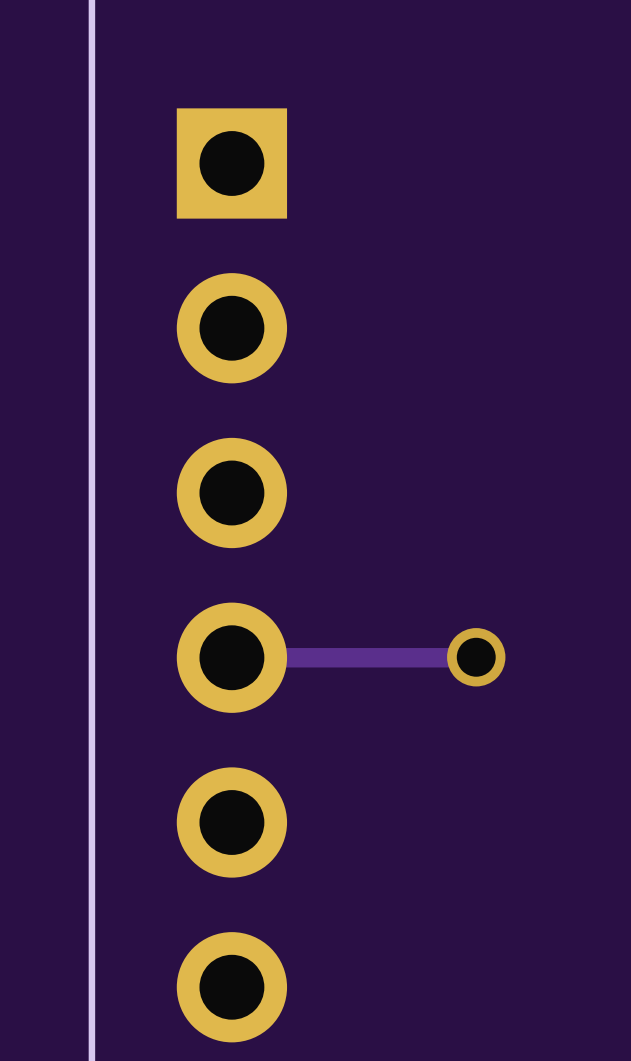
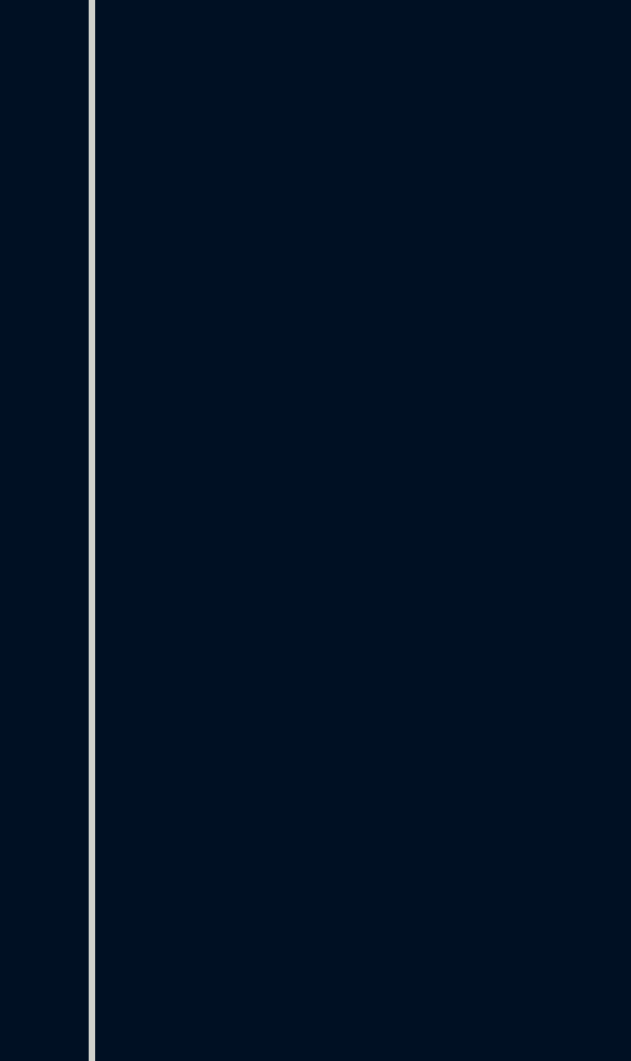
part: (231, 575) -> none
track: (475, 657) (231, 657) -> none
via: (476, 657) -> none

